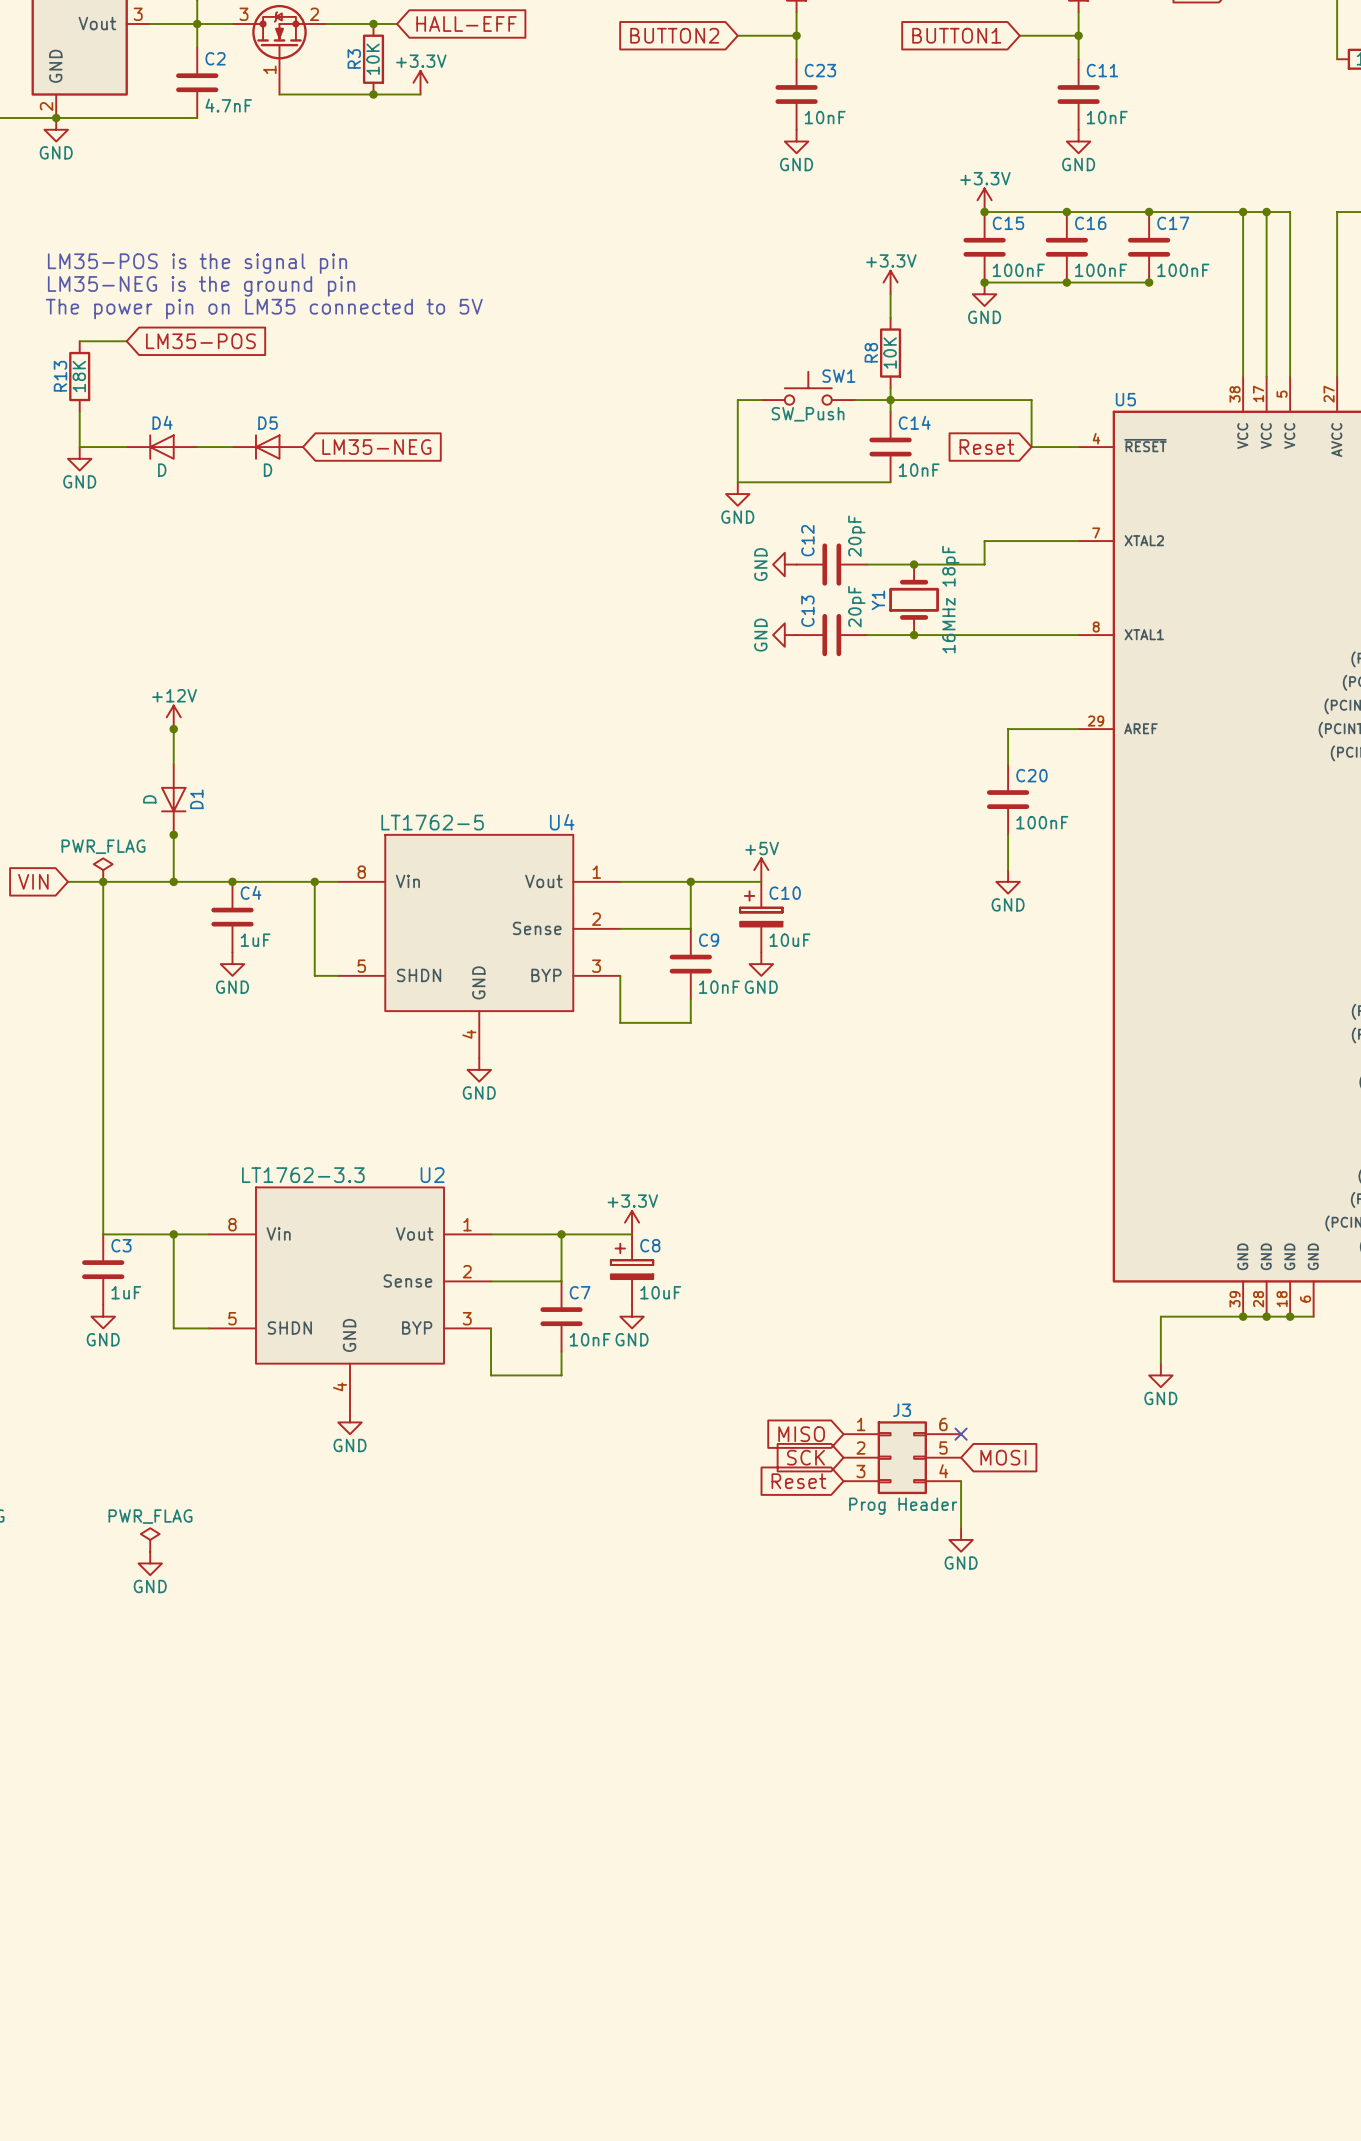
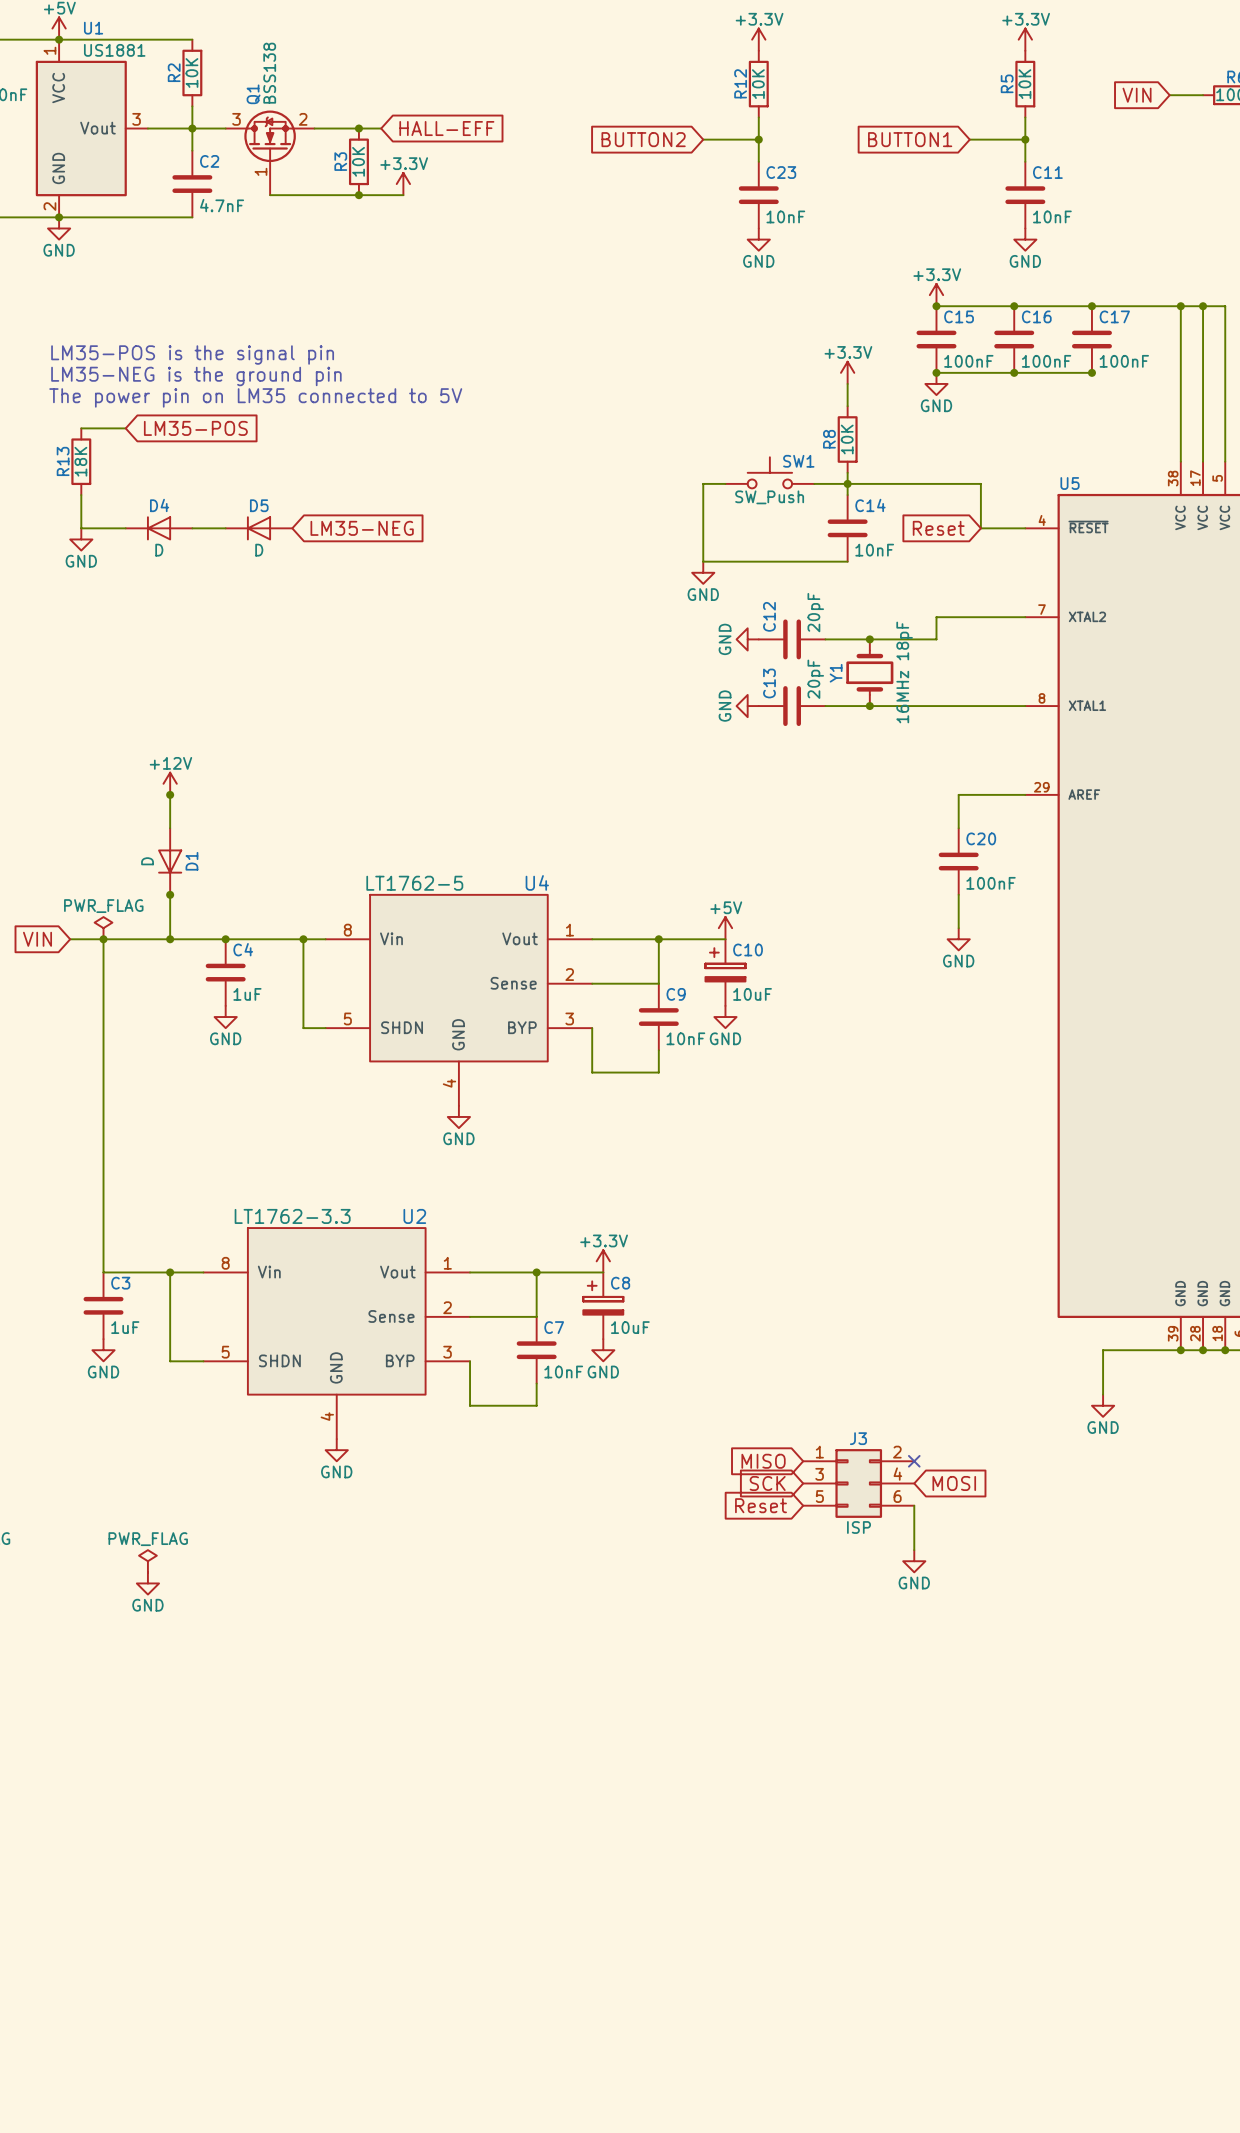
J3 pin number: 6 (943, 1424) -> 2 (897, 1452)
J3 pin number: 2 (860, 1447) -> 3 (819, 1474)
J3 pin number: 5 (943, 1447) -> 4 (897, 1474)
J3 pin number: 3 (860, 1471) -> 5 (819, 1496)
J3 pin number: 4 (943, 1471) -> 6 (897, 1496)
J3 value: Prog Header (903, 1506) -> ISP (859, 1527)

